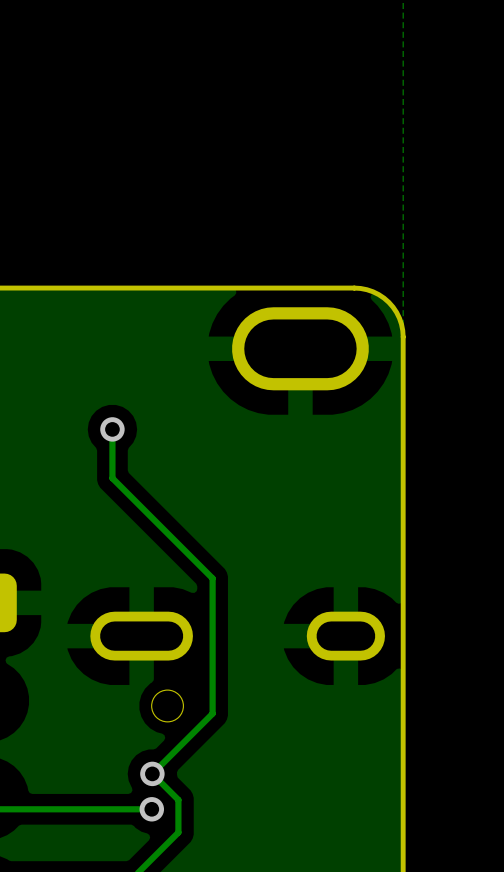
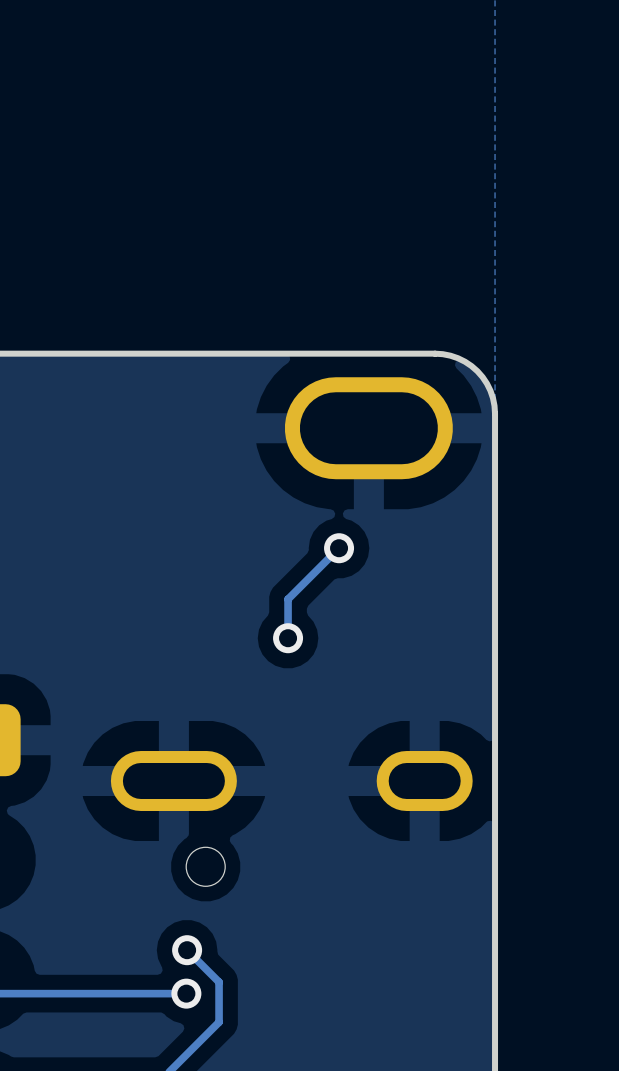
track: (112, 429) (112, 478) (212, 578) (212, 713) (152, 773) -> none
via: (112, 429) -> none
track: none -> (339, 548) (288, 599) (288, 638)
via: none -> (339, 548)
via: none -> (288, 638)

